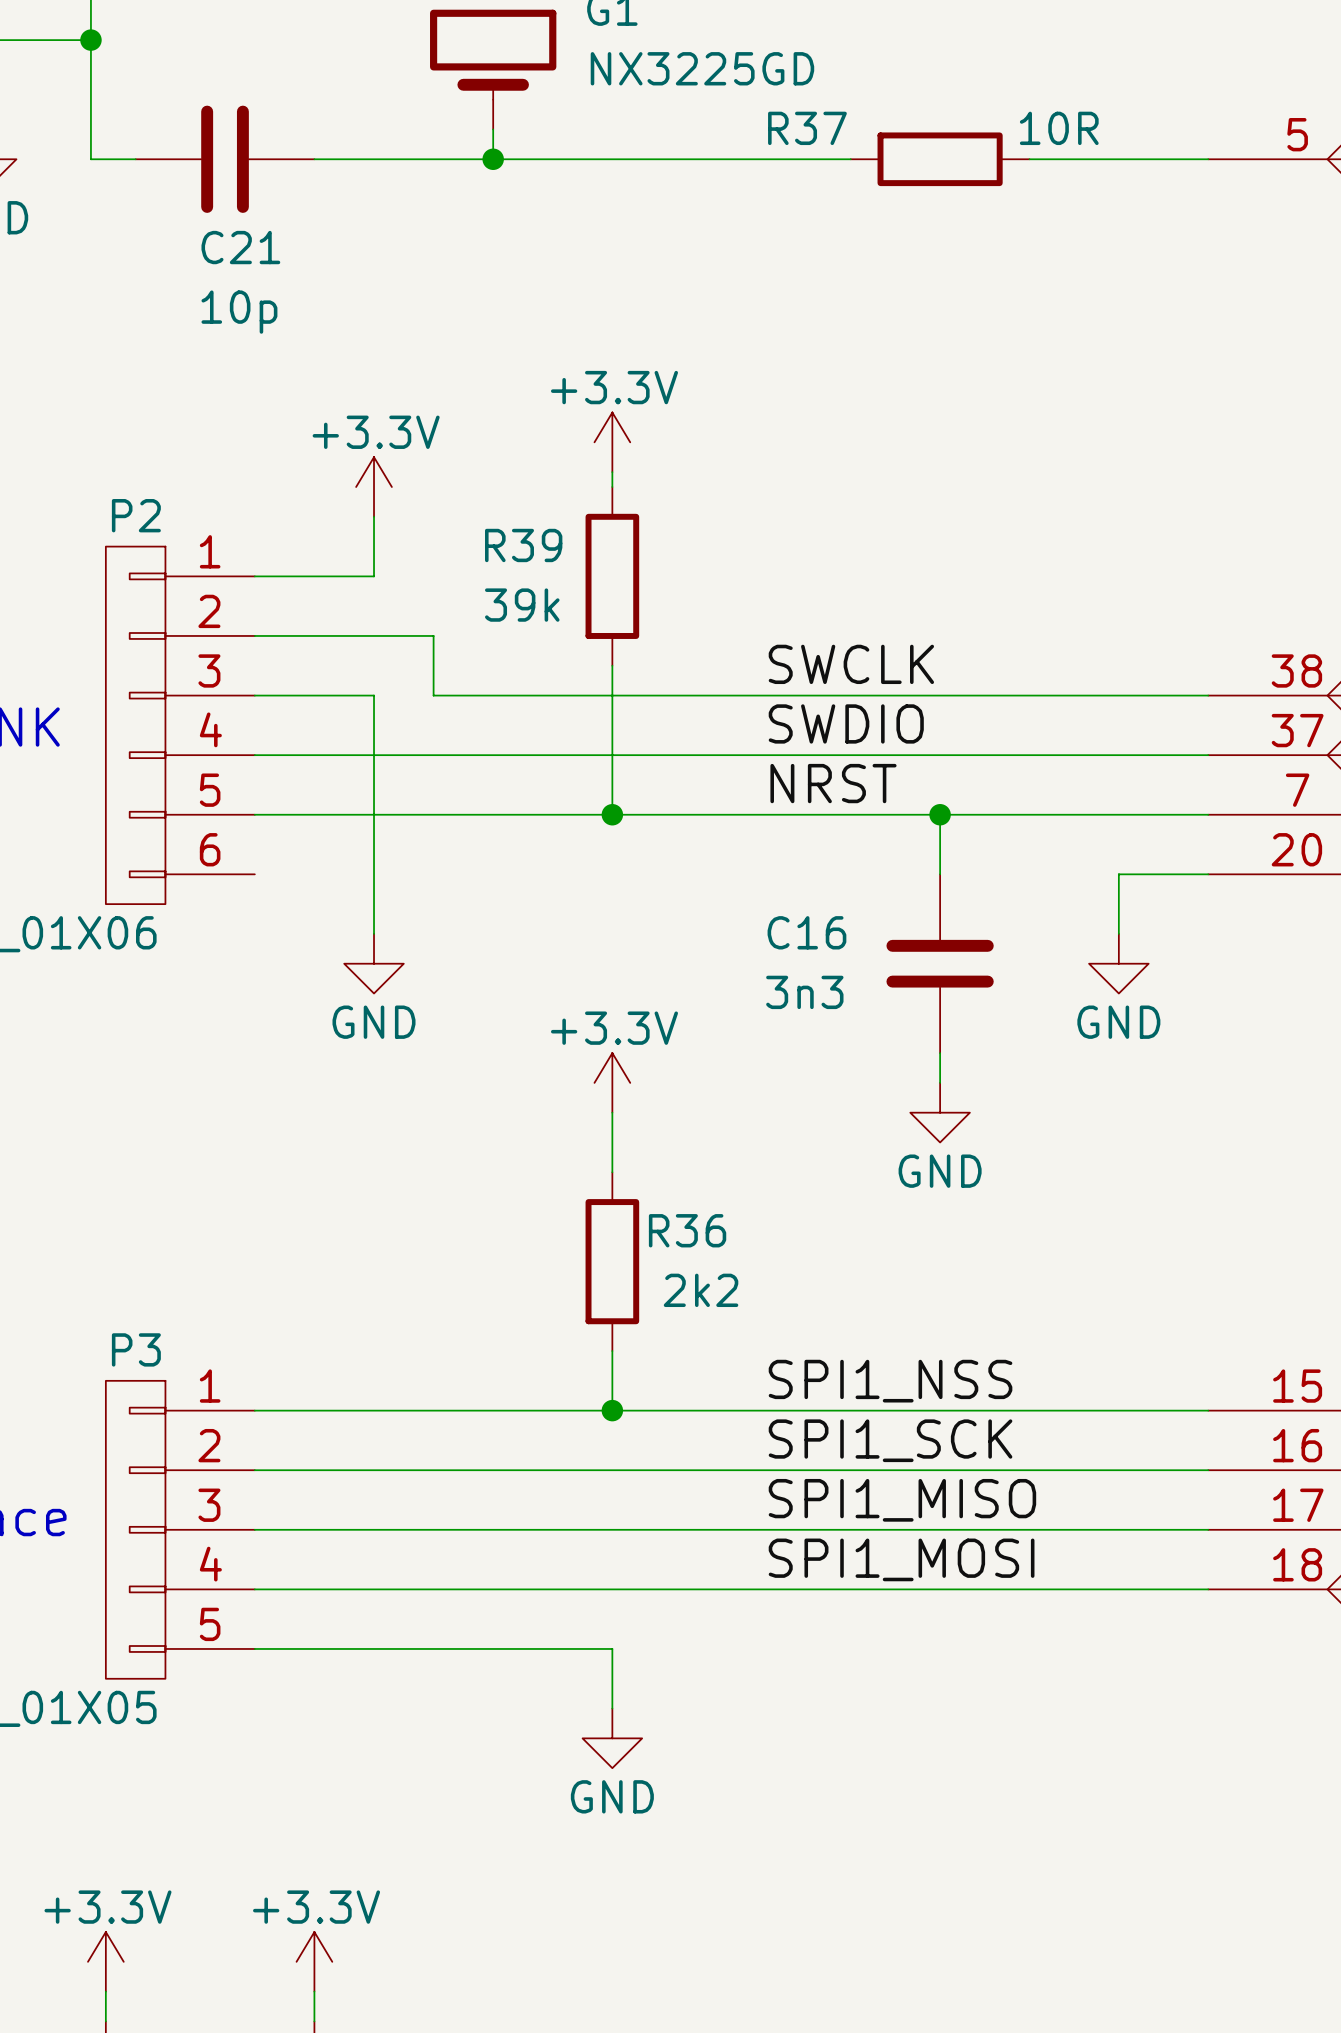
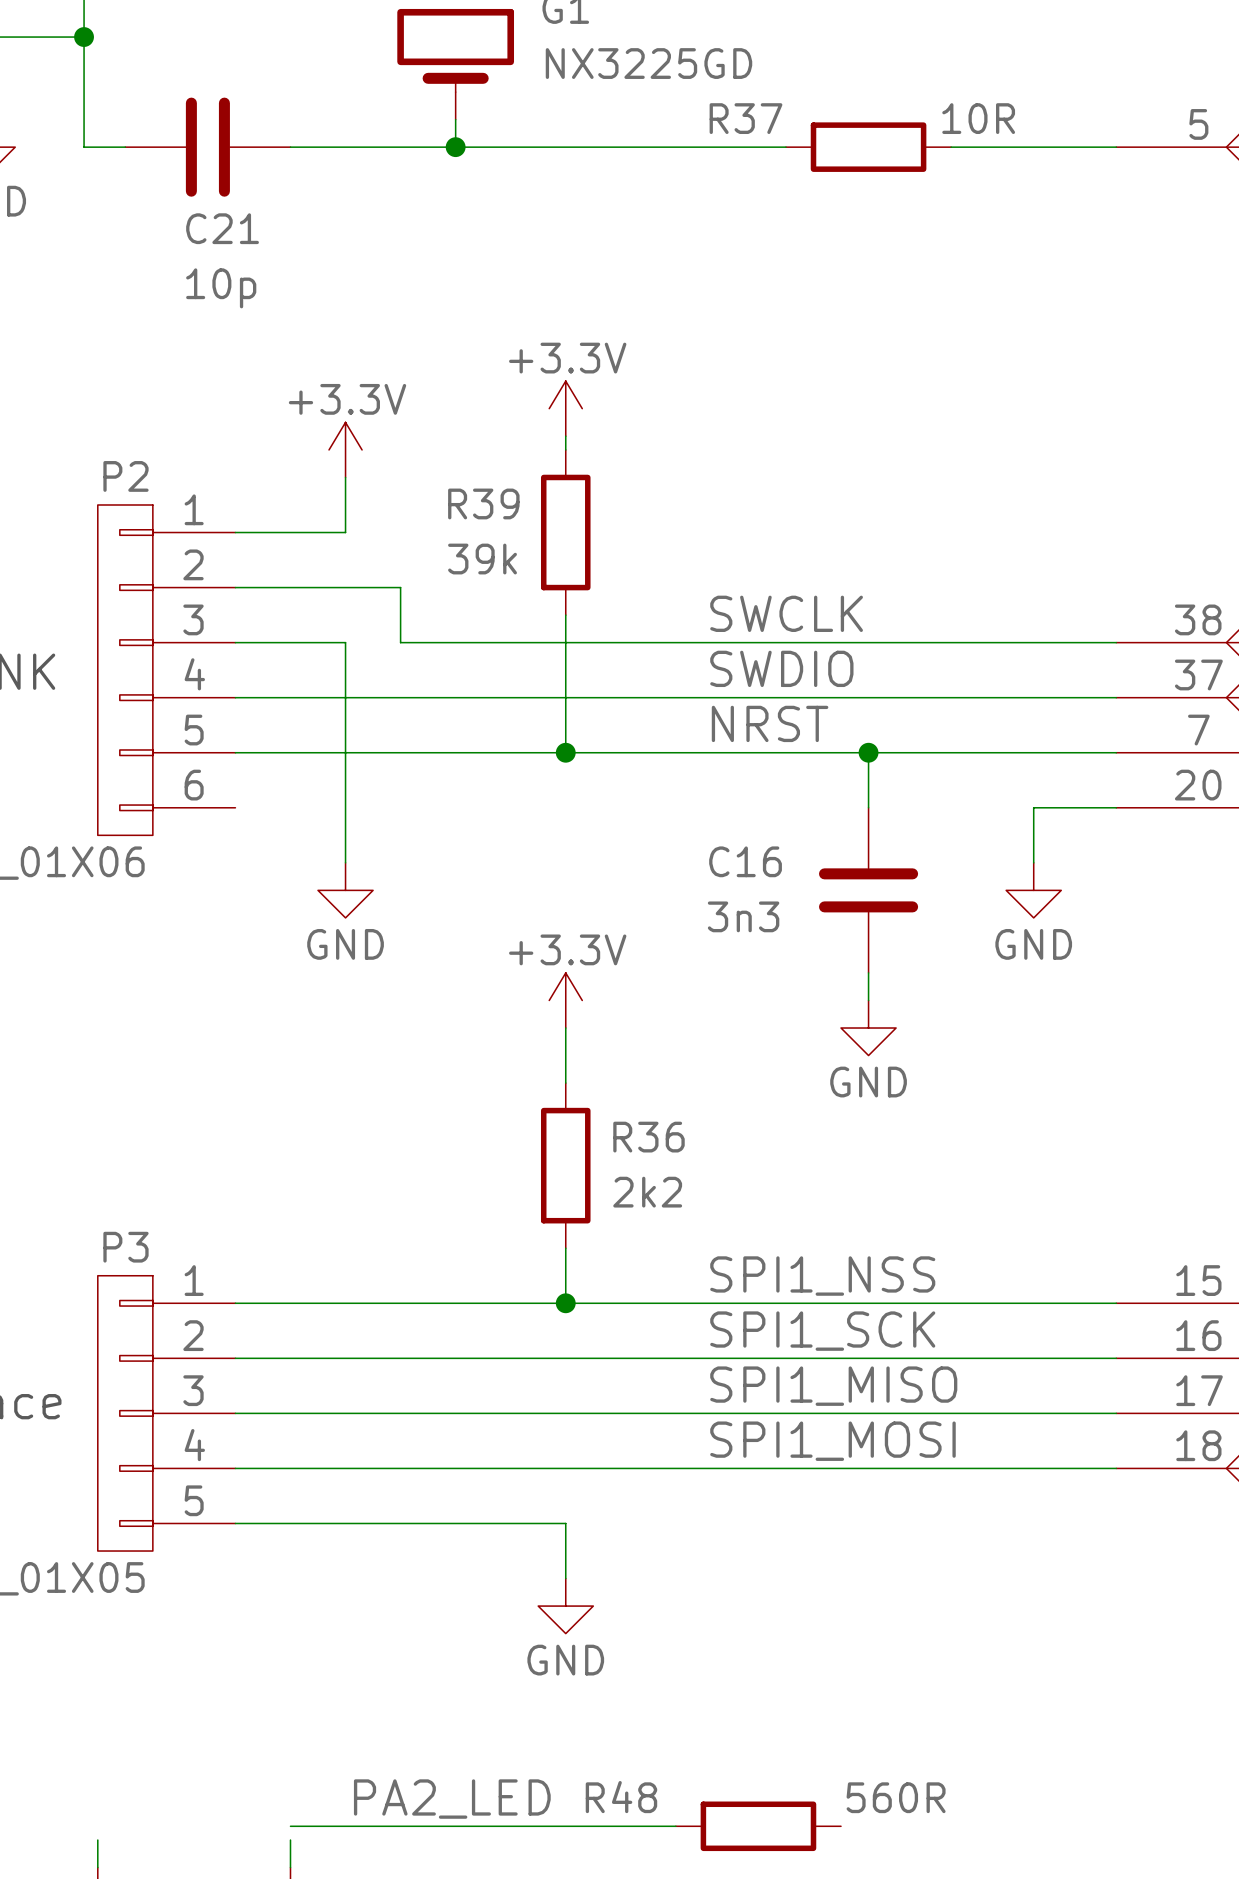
R36 name position: R36 (687, 1230) -> R36 (648, 1137)
label: none -> PA2_LED (452, 1799)
power symbol: +3.3V (105, 1961) -> none
power symbol: +3.3V (314, 1961) -> none
wire: none -> (290, 1826) (675, 1826)
R48: none -> 560R (758, 1826)

